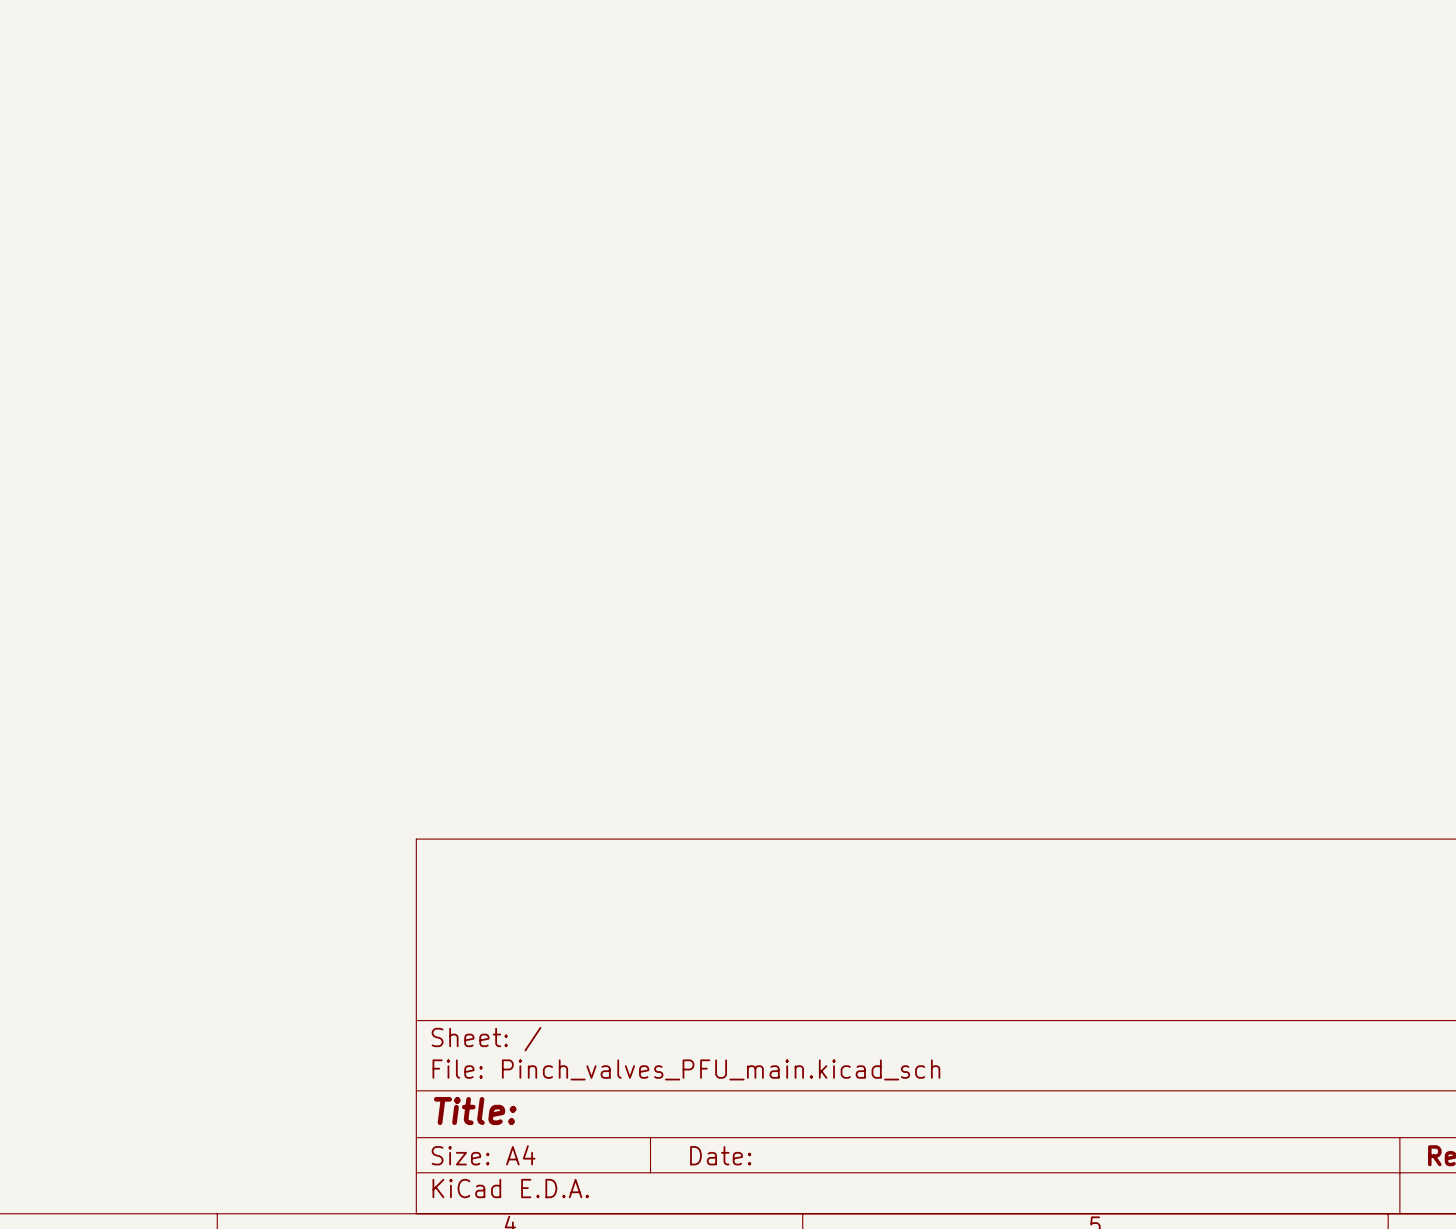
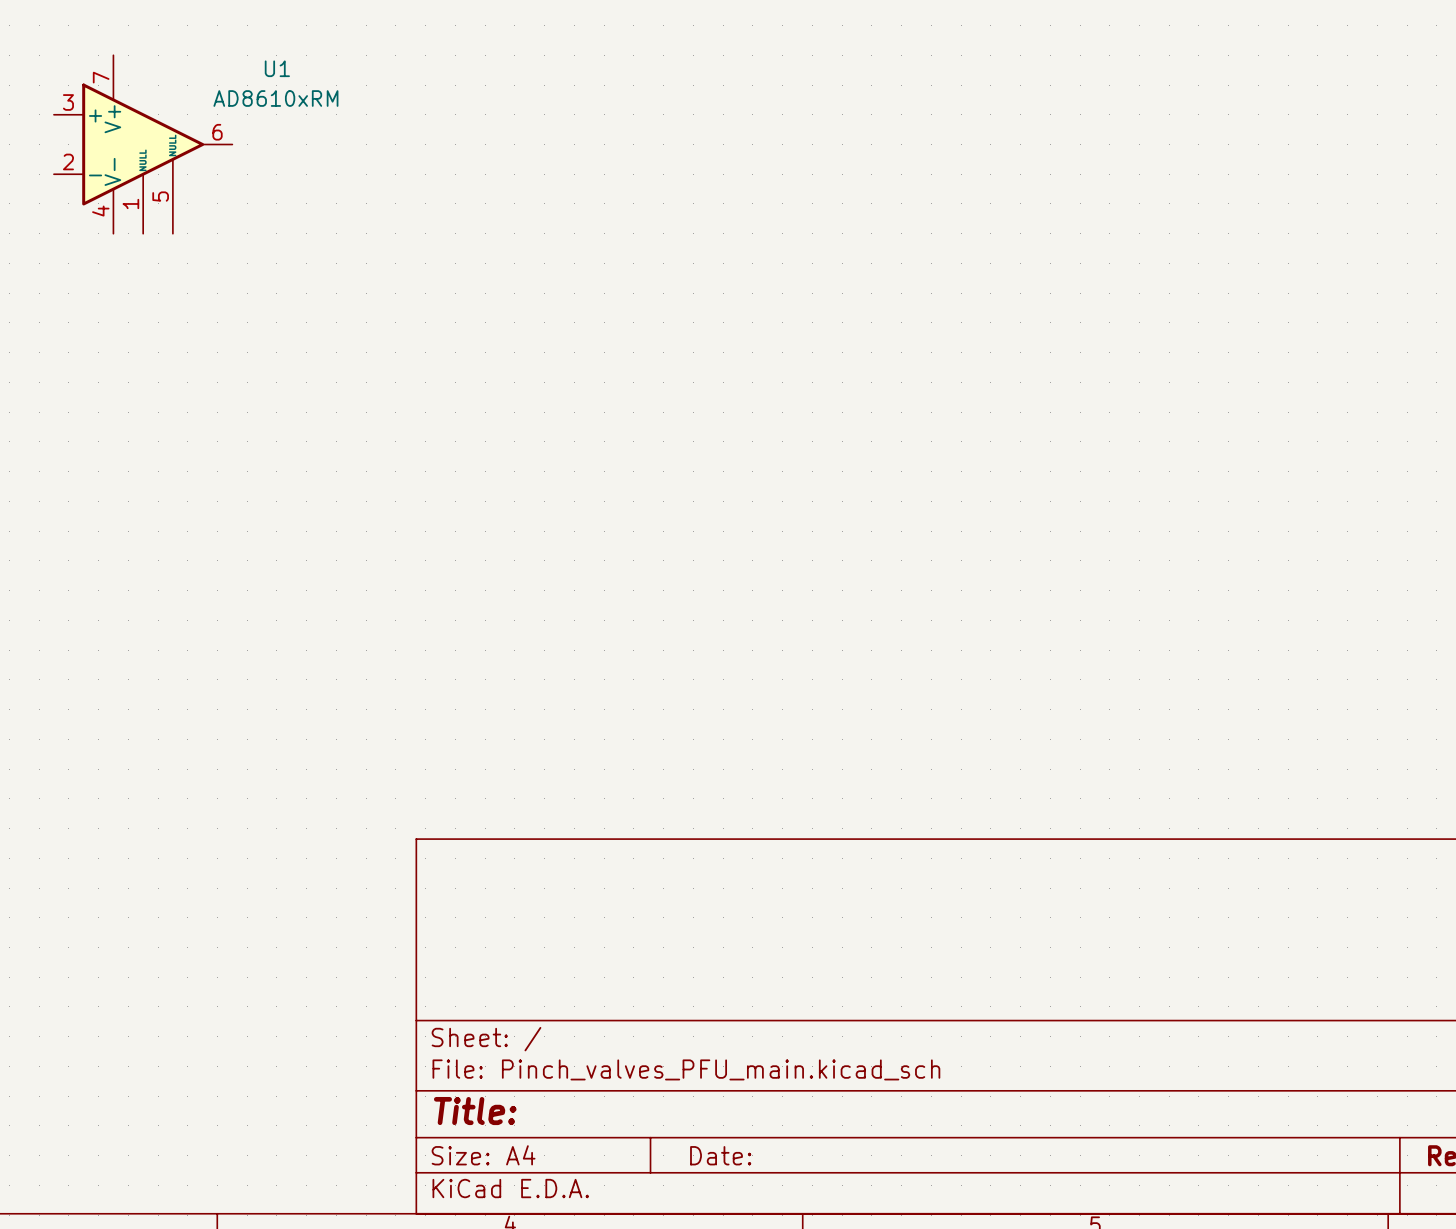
U1: none -> AD8610xRM (143, 144)

